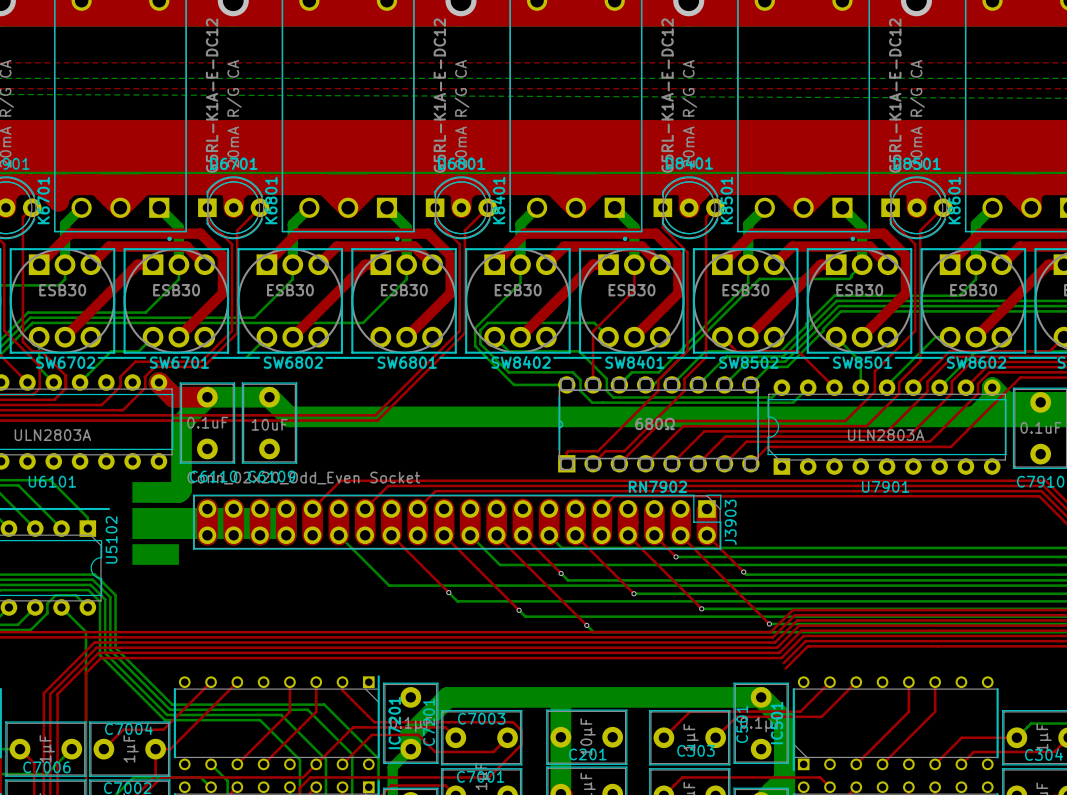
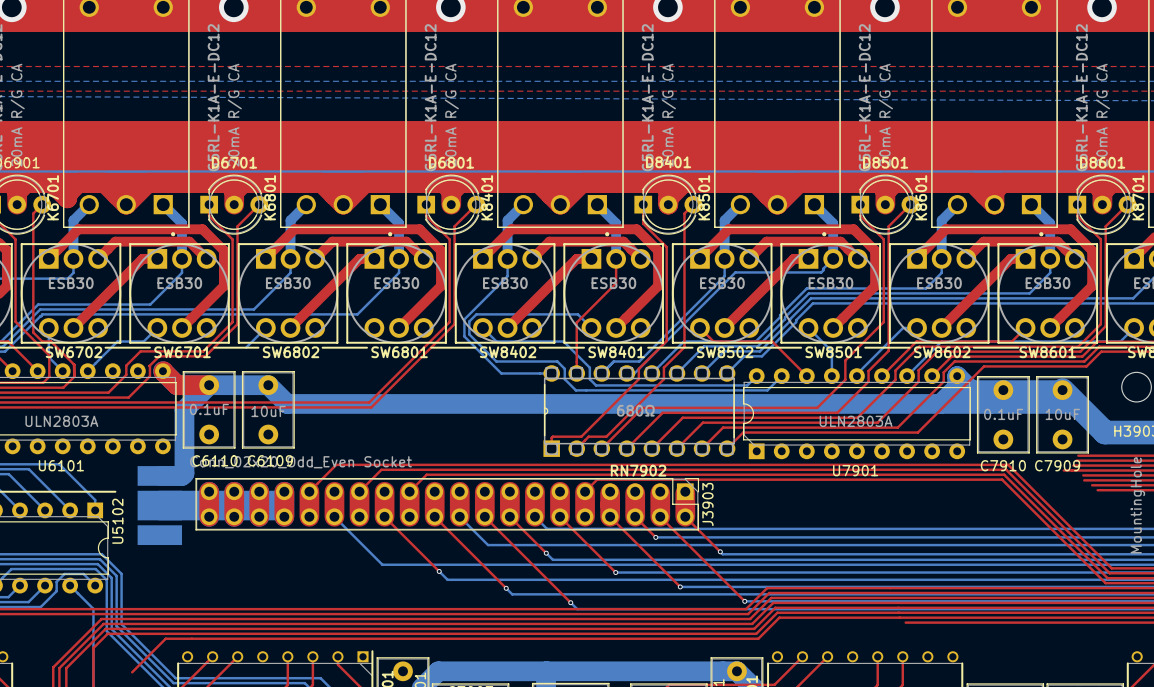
top track: (938, 646) (807, 646) (785, 668) -> none
top track: none -> (758, 638) (165, 638) (132, 672)

